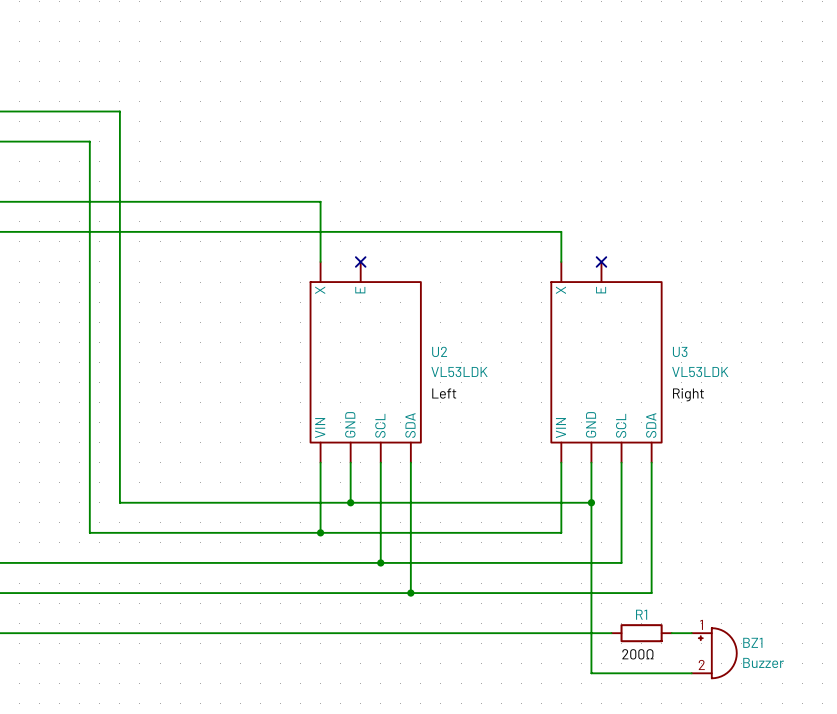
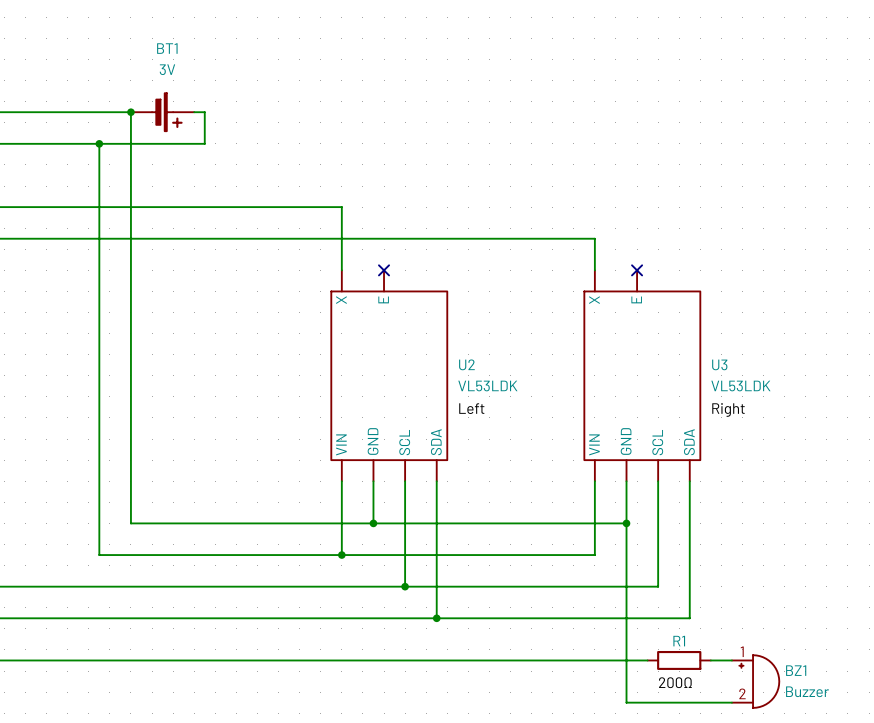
junction: none -> (130, 112)
BT1: none -> 3V (162, 112)
wire: none -> (194, 112) (204, 112) (204, 143) (99, 143)
junction: none -> (99, 143)

